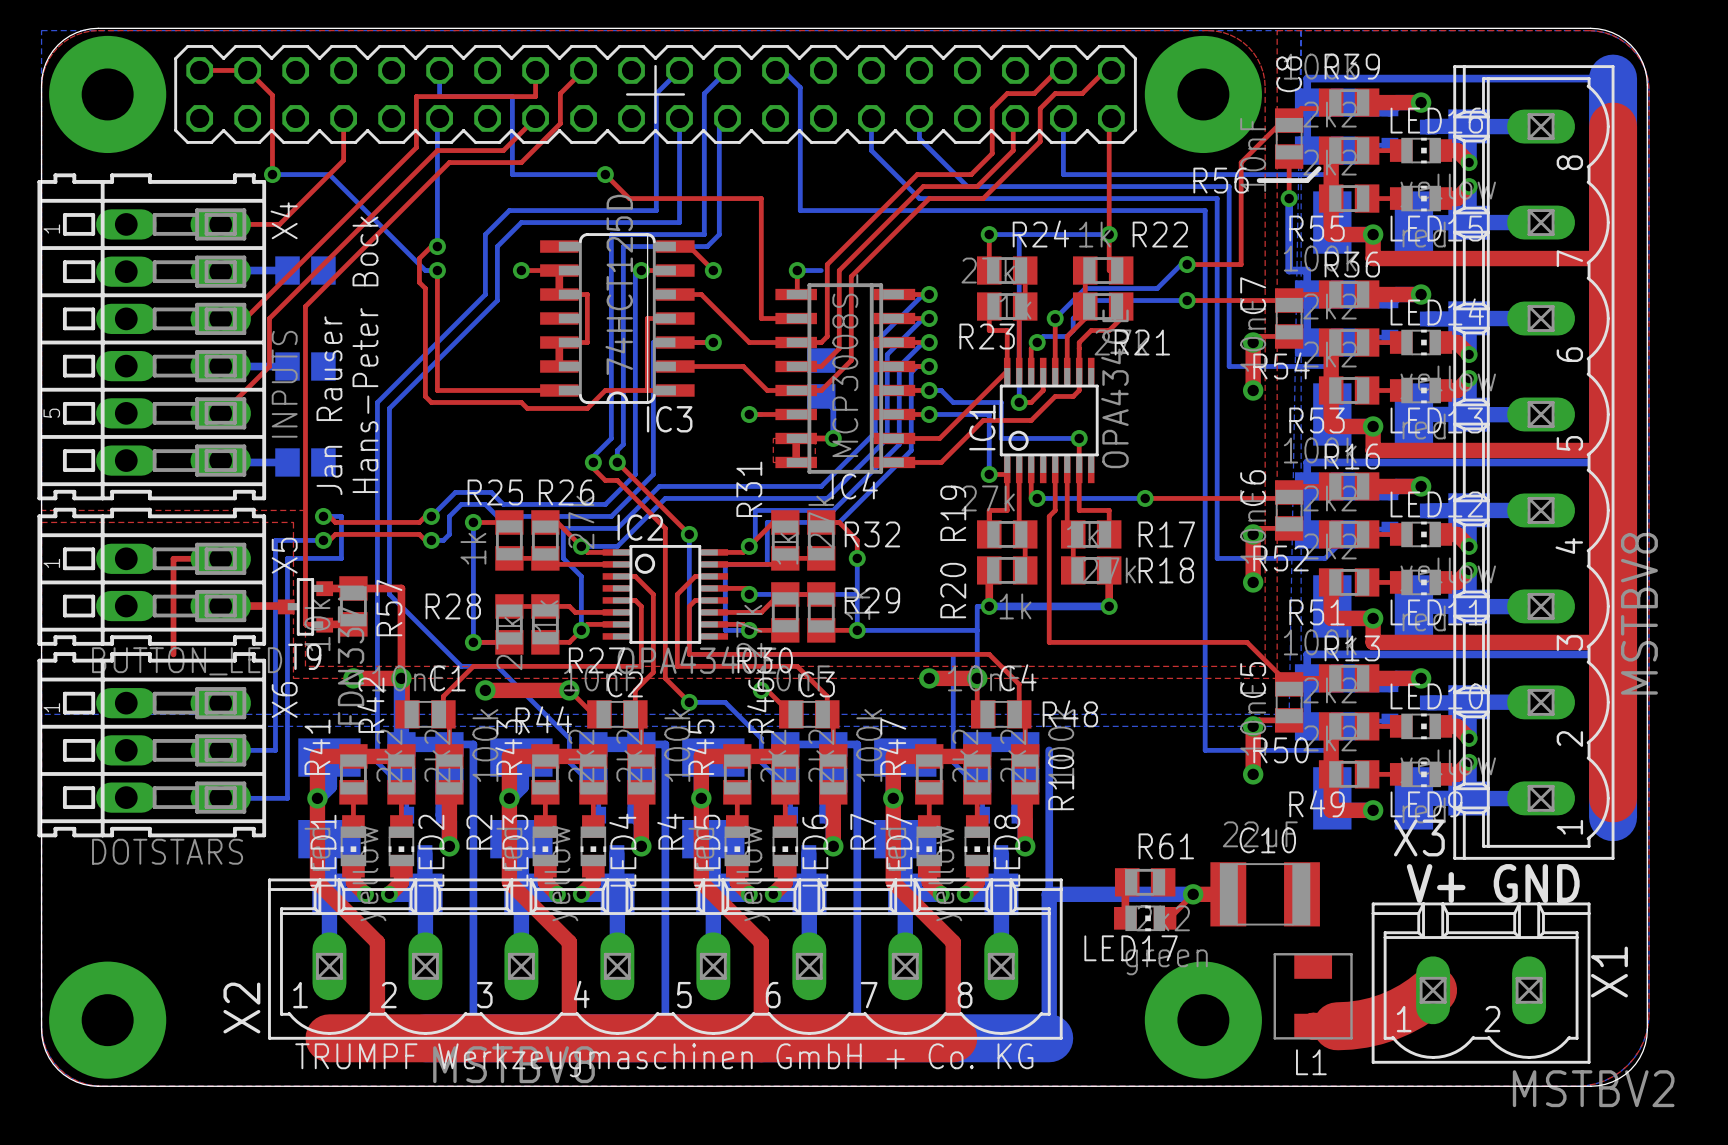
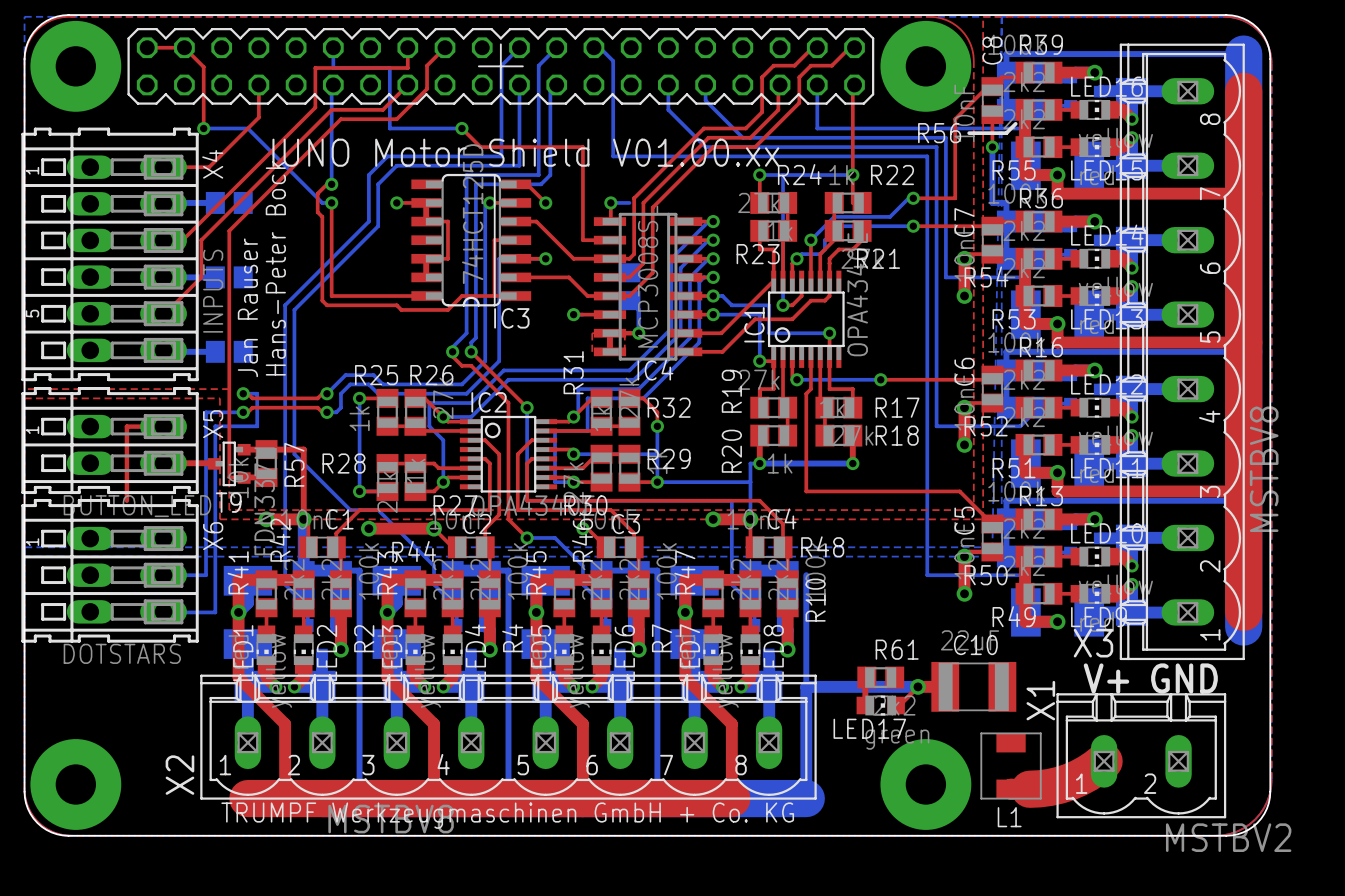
text: none -> IUNO Motor Shield V01.00.xx (525, 152)
X1 name position: X1 (1609, 972) -> X1 (1040, 700)

